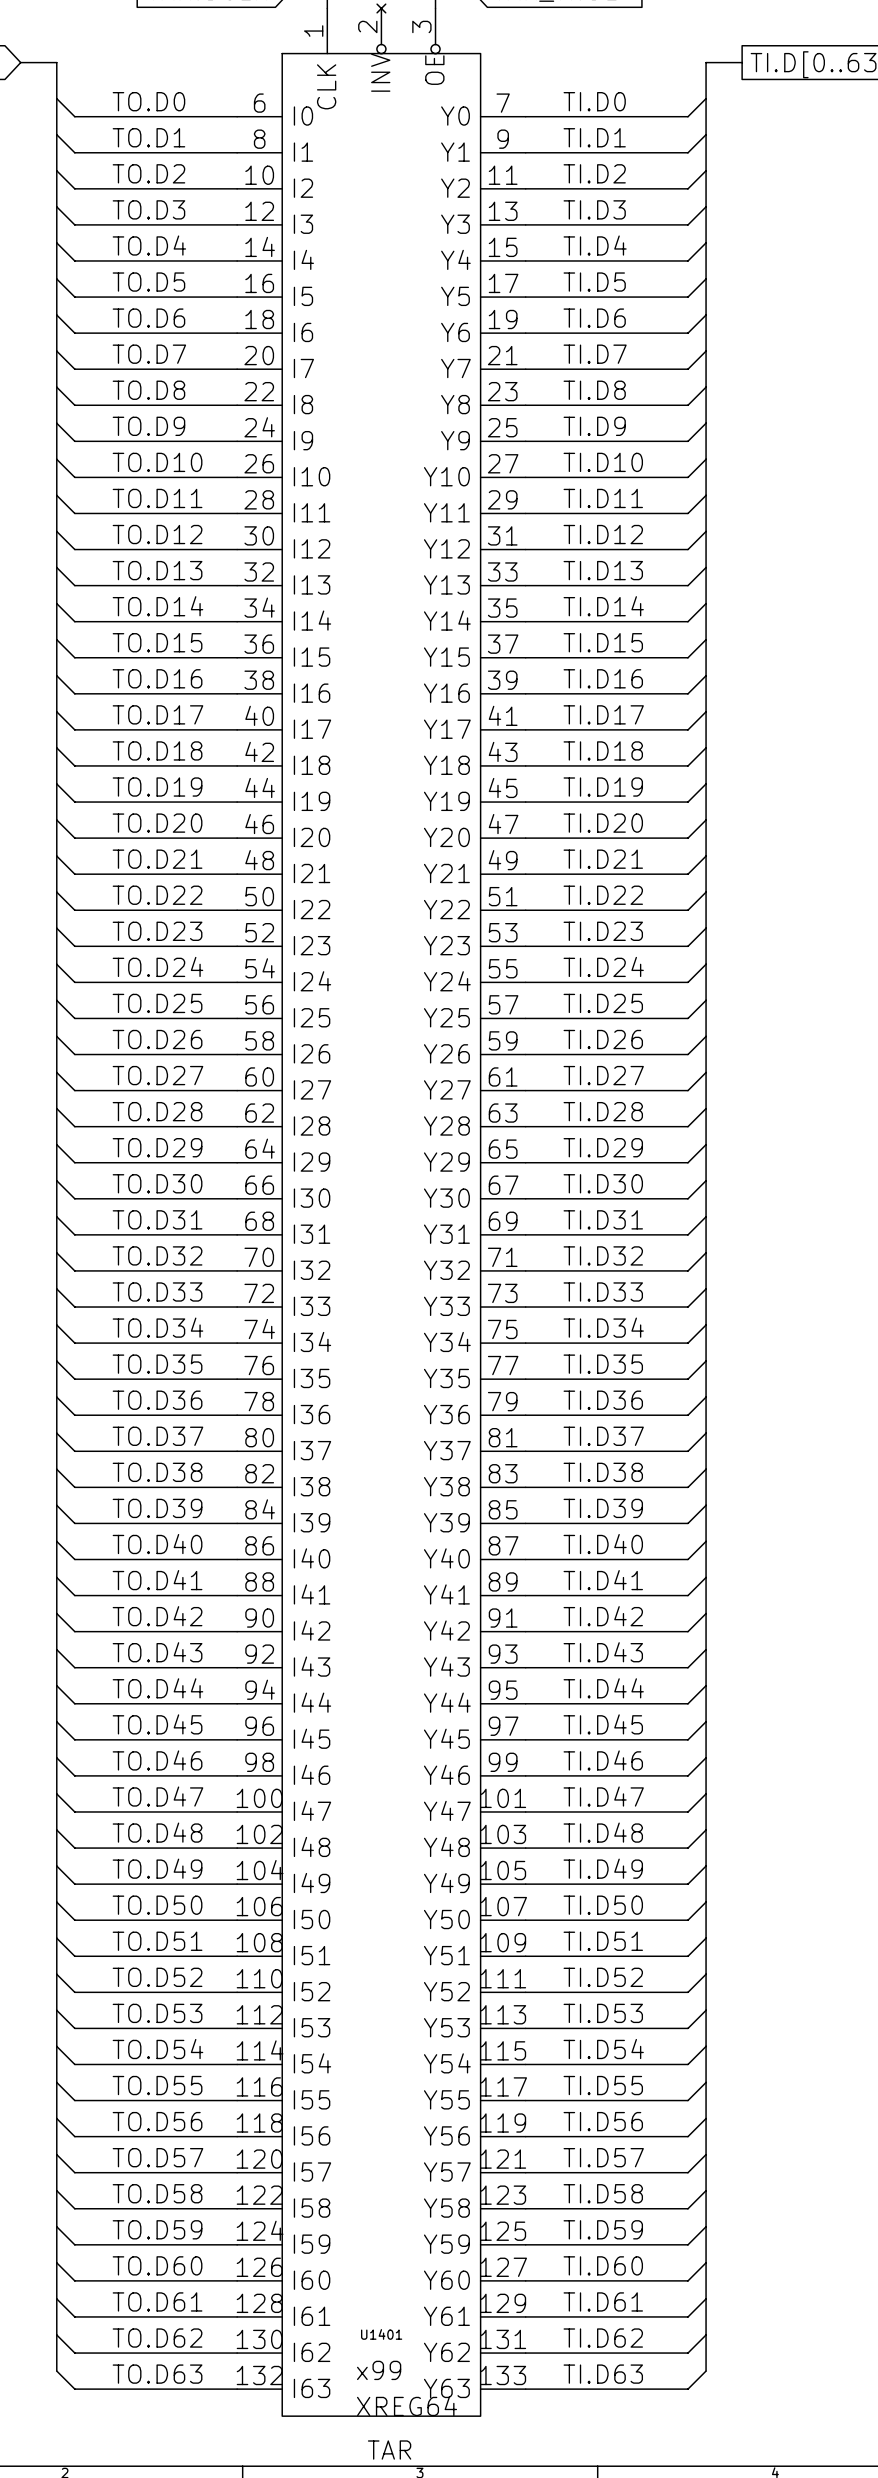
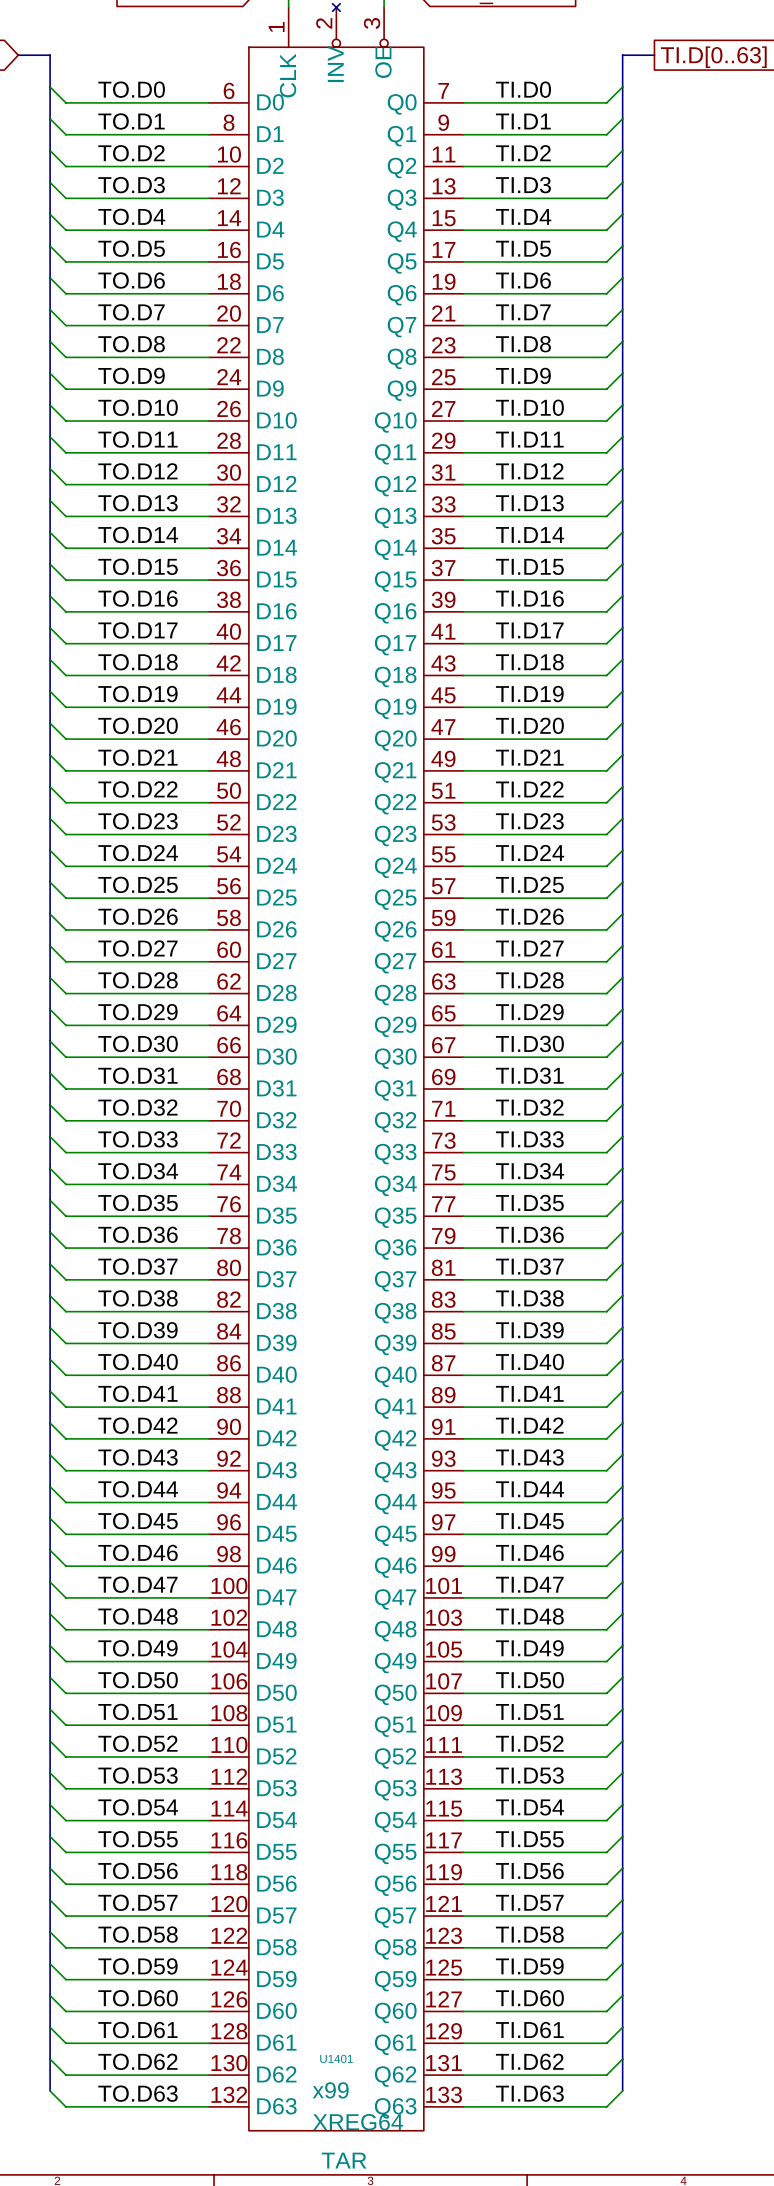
U1401 symbol: [237, 8, 526, 2417] -> [209, 7, 464, 2131]

